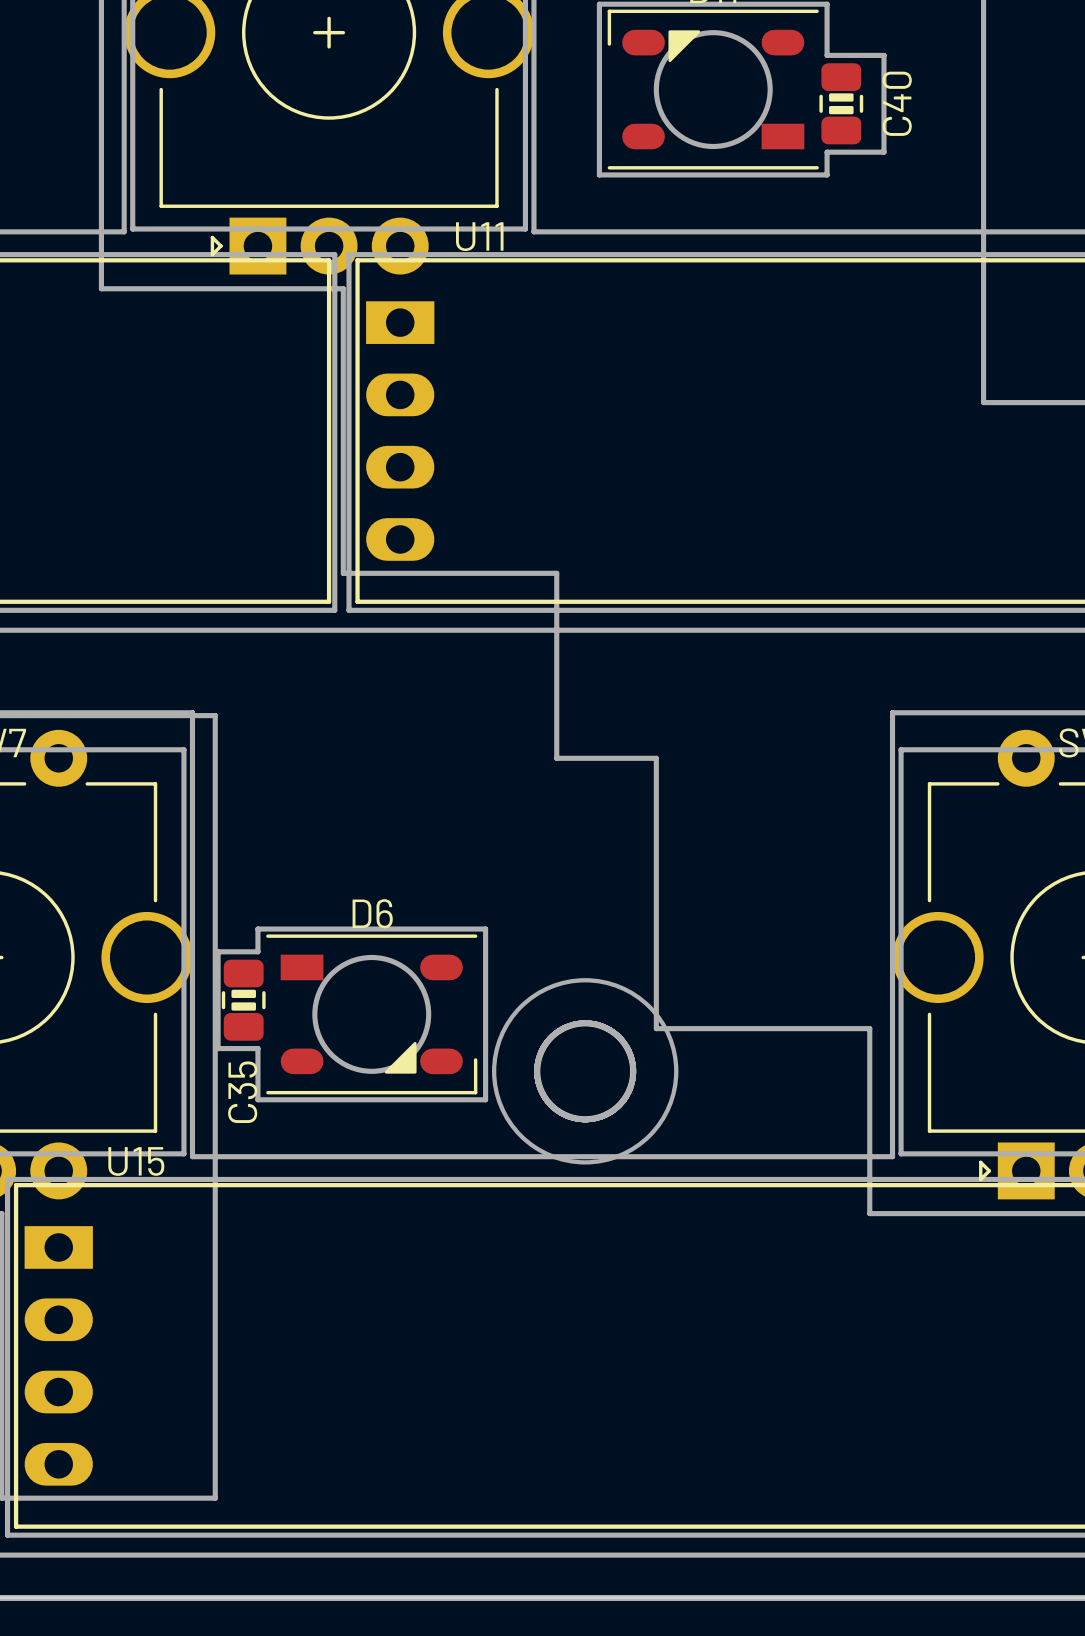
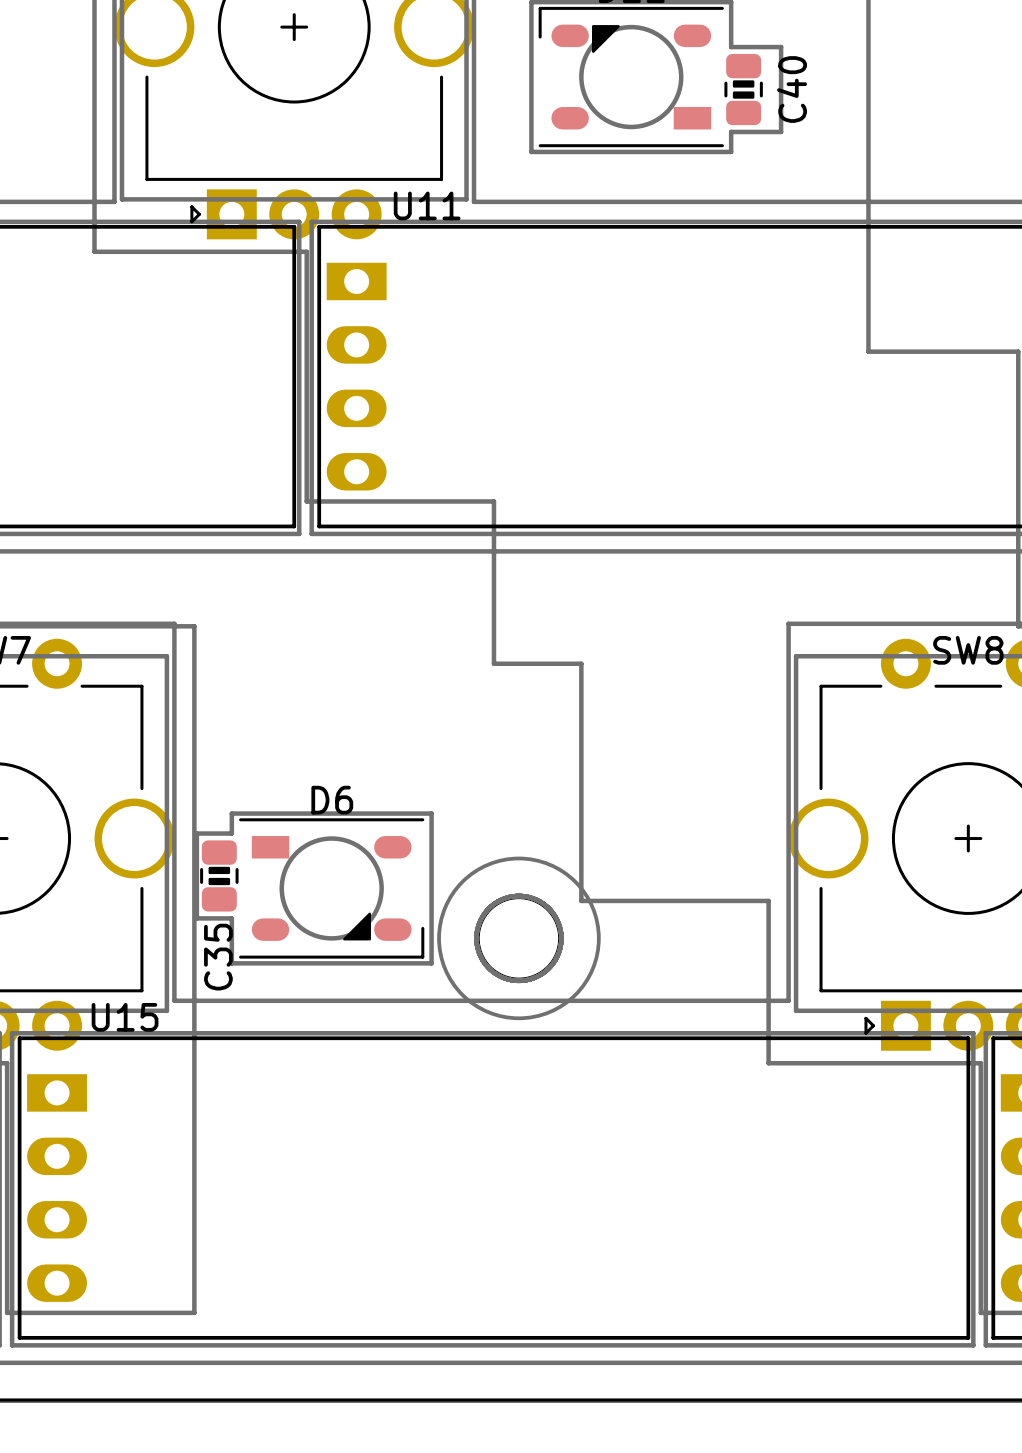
line: (192, 1142) (192, 1156) (892, 1156) (892, 1142) -> (174, 1000) (788, 1000)

